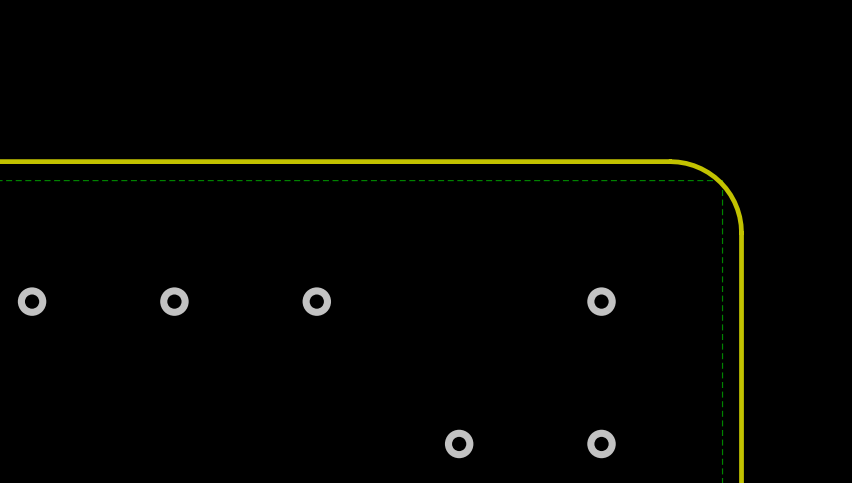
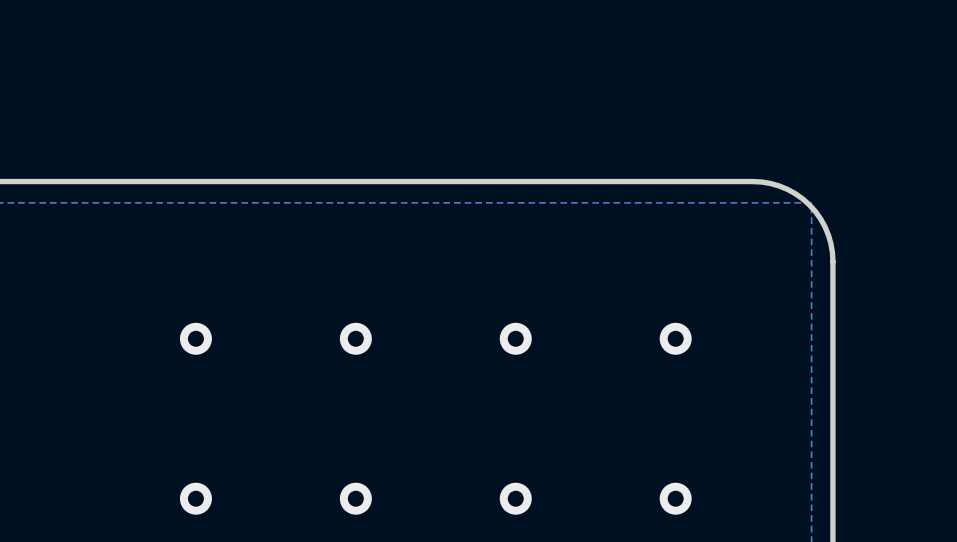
via: (32, 301) -> none
via: none -> (515, 338)
via: none -> (195, 498)
via: none -> (355, 498)

